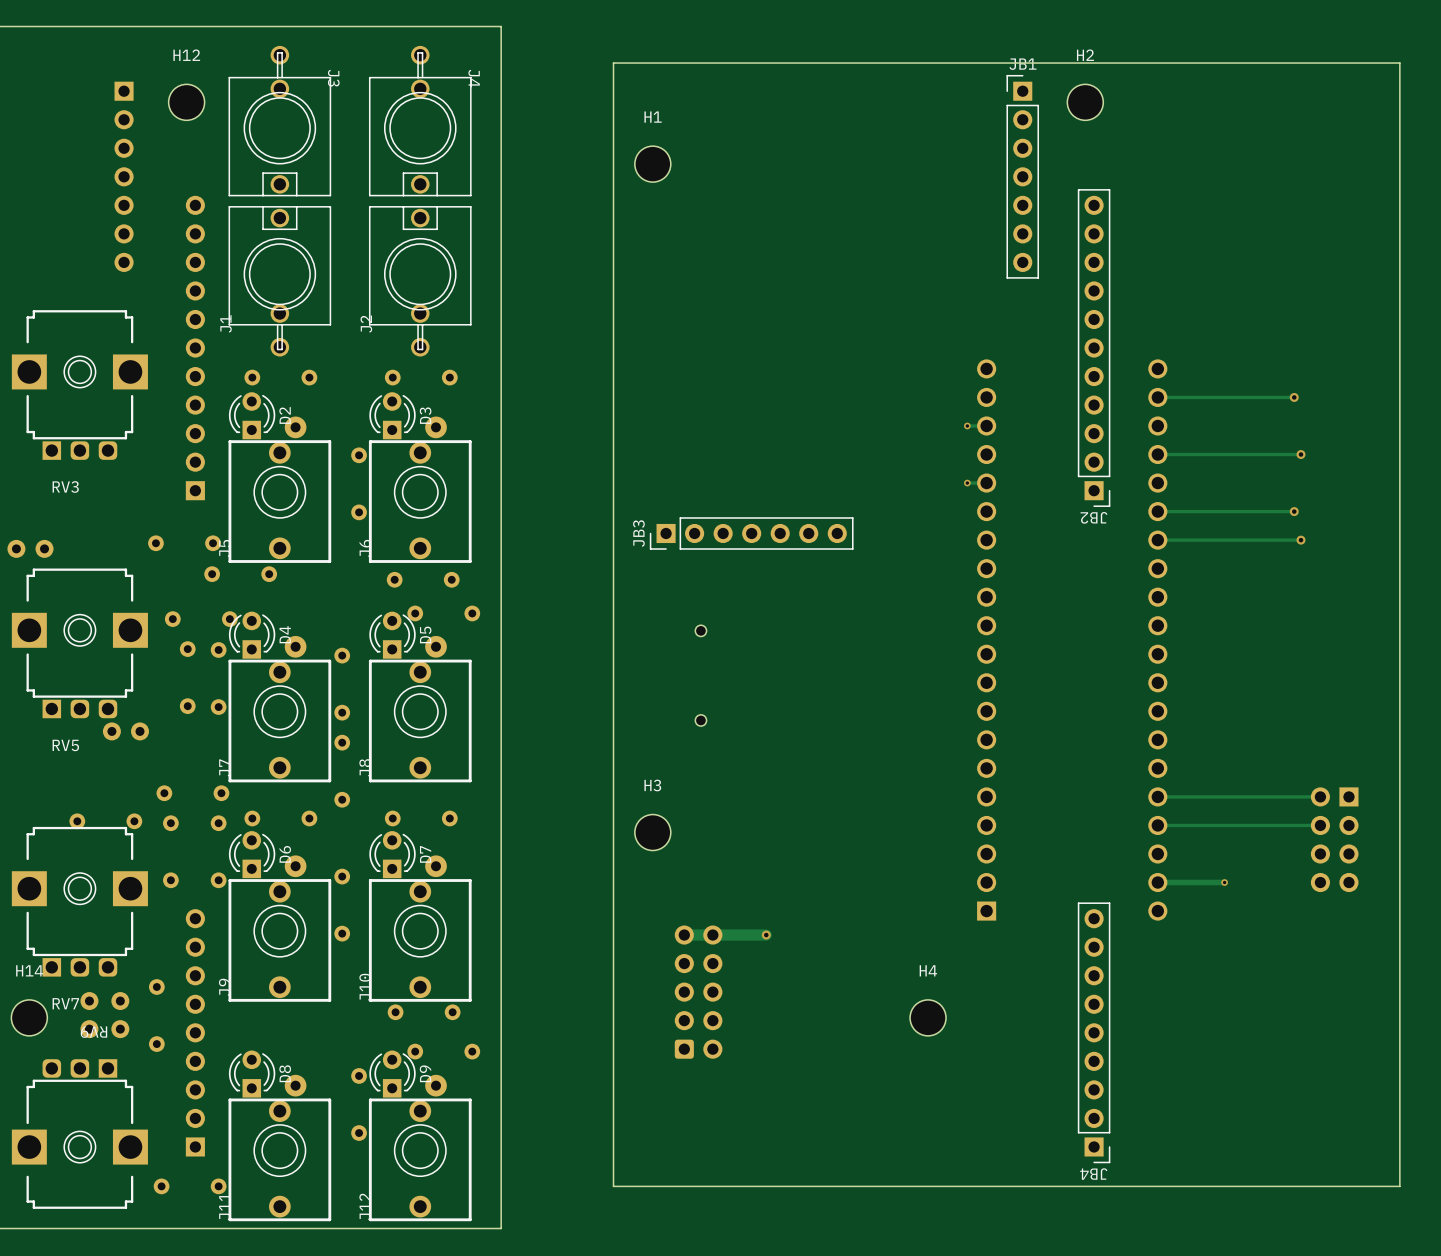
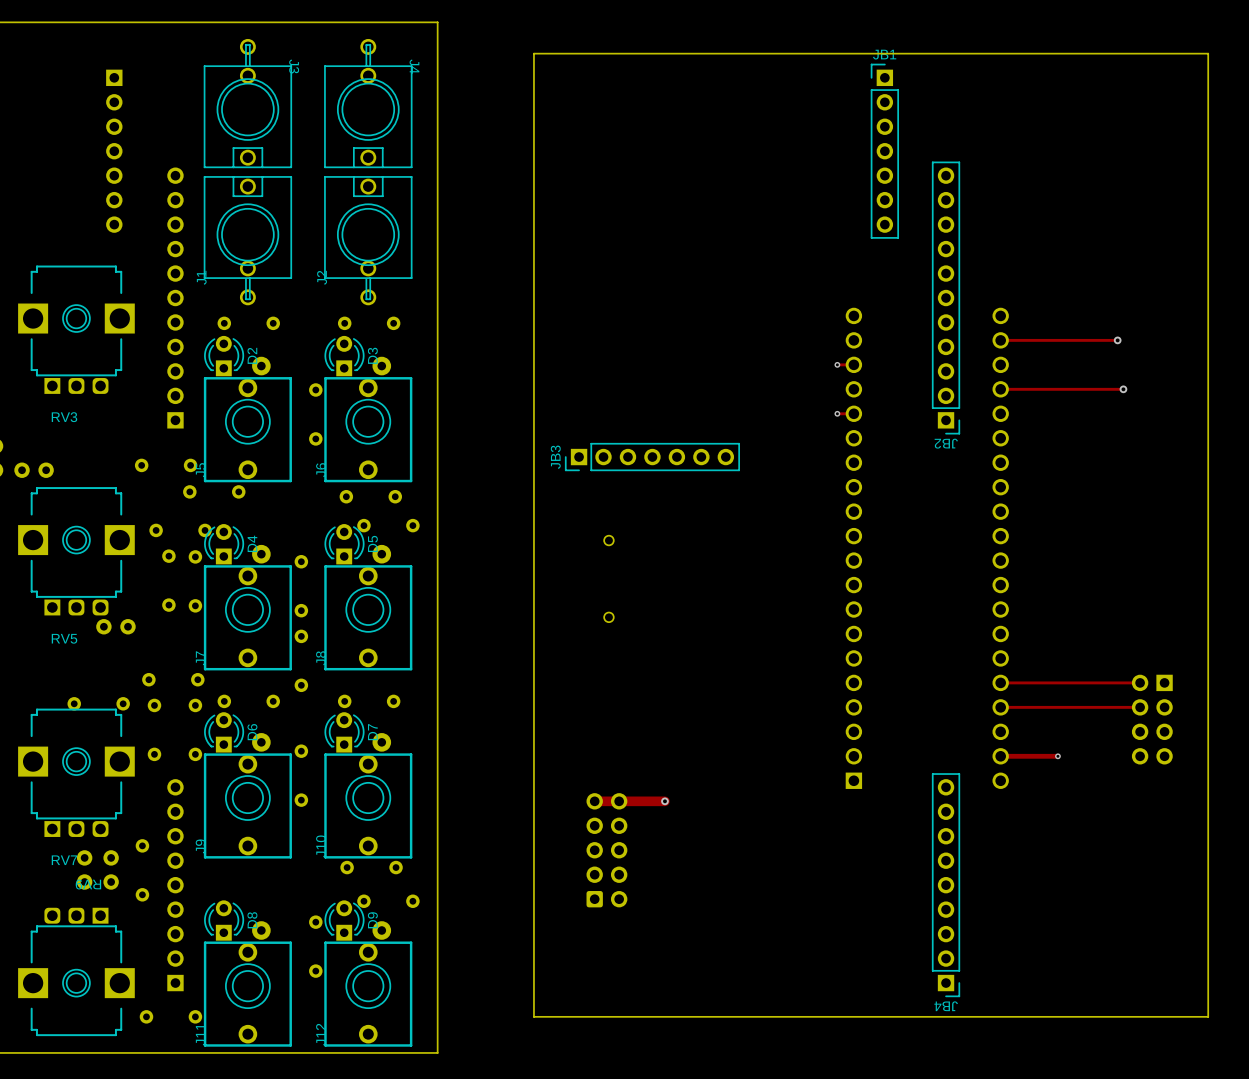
H12: (186, 102) -> none
H2: (1085, 102) -> none
H1: (652, 164) -> none
track: (1157, 511) (1294, 511) -> none
via: (1294, 511) -> none
track: (1157, 540) (1301, 540) -> none
via: (1301, 540) -> none
H3: (652, 832) -> none
H14: (29, 1017) -> none
H4: (928, 1017) -> none

